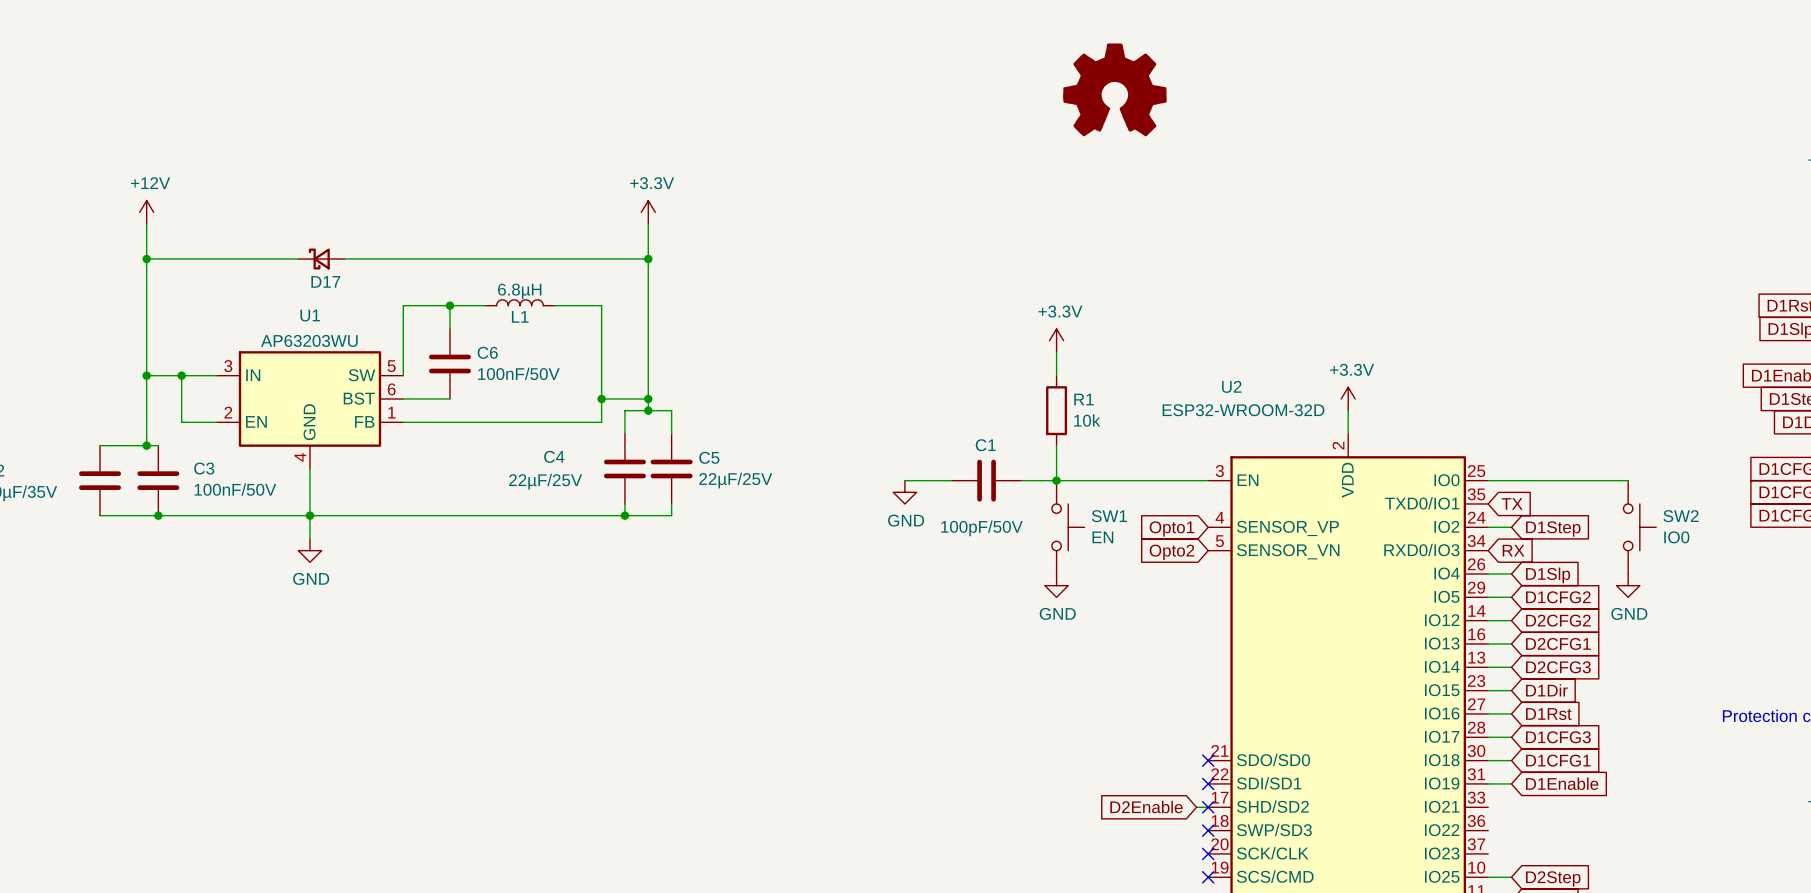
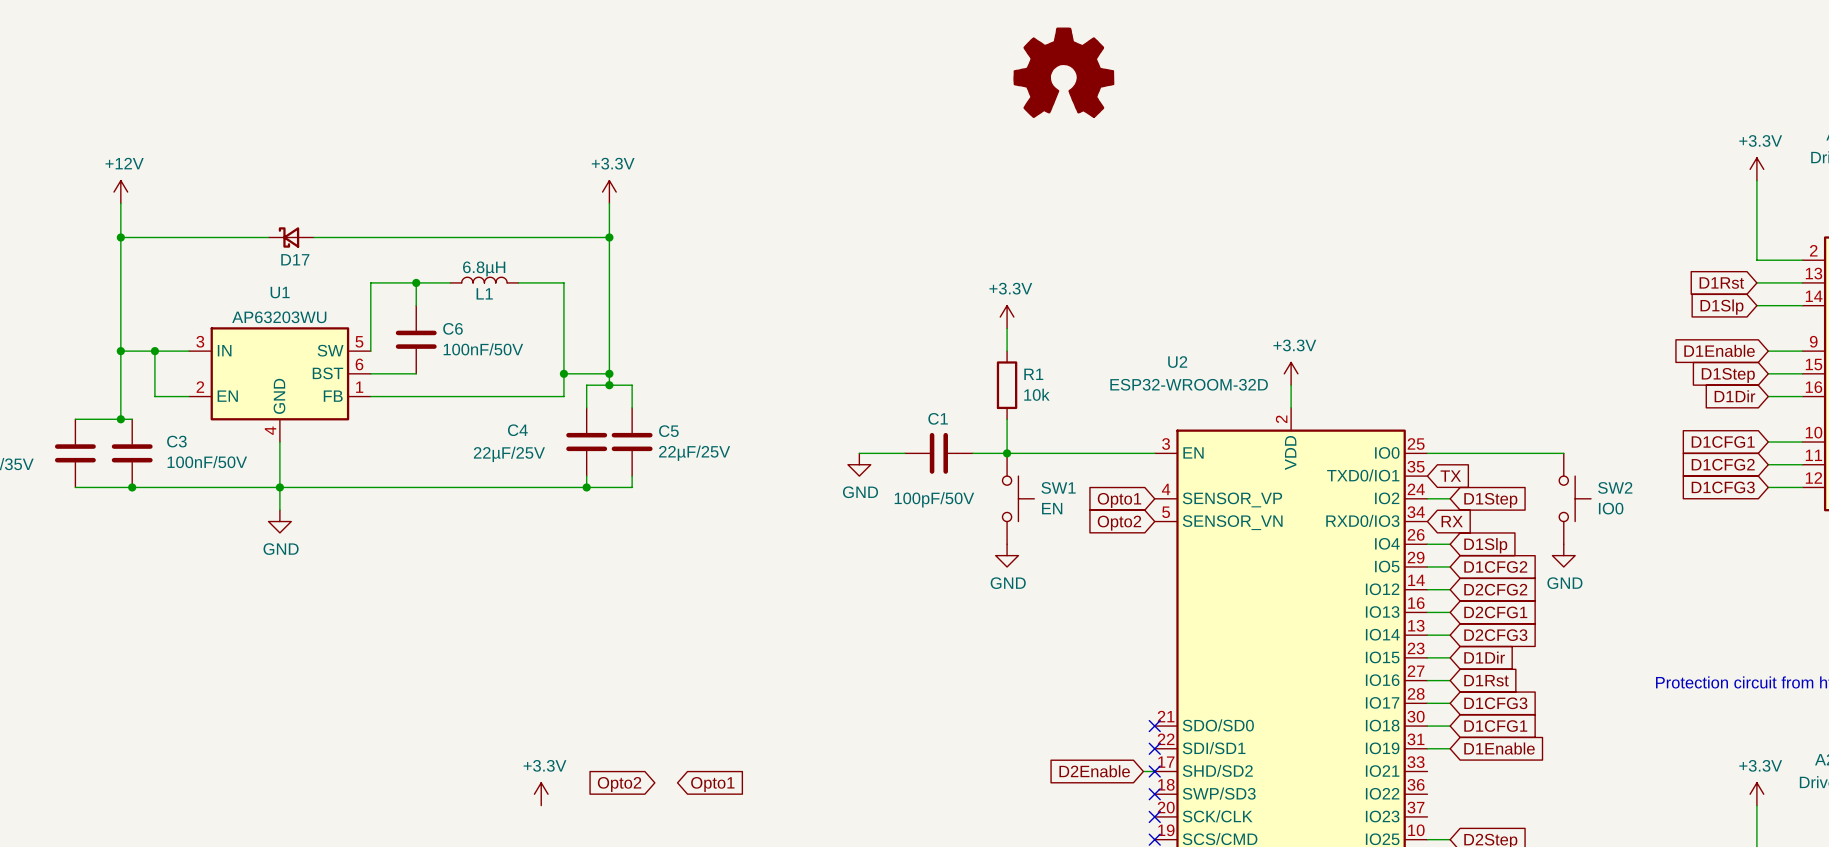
global label: none -> Opto2 (619, 784)
global label: none -> Opto1 (712, 784)
power symbol: none -> +3.3V (541, 794)

